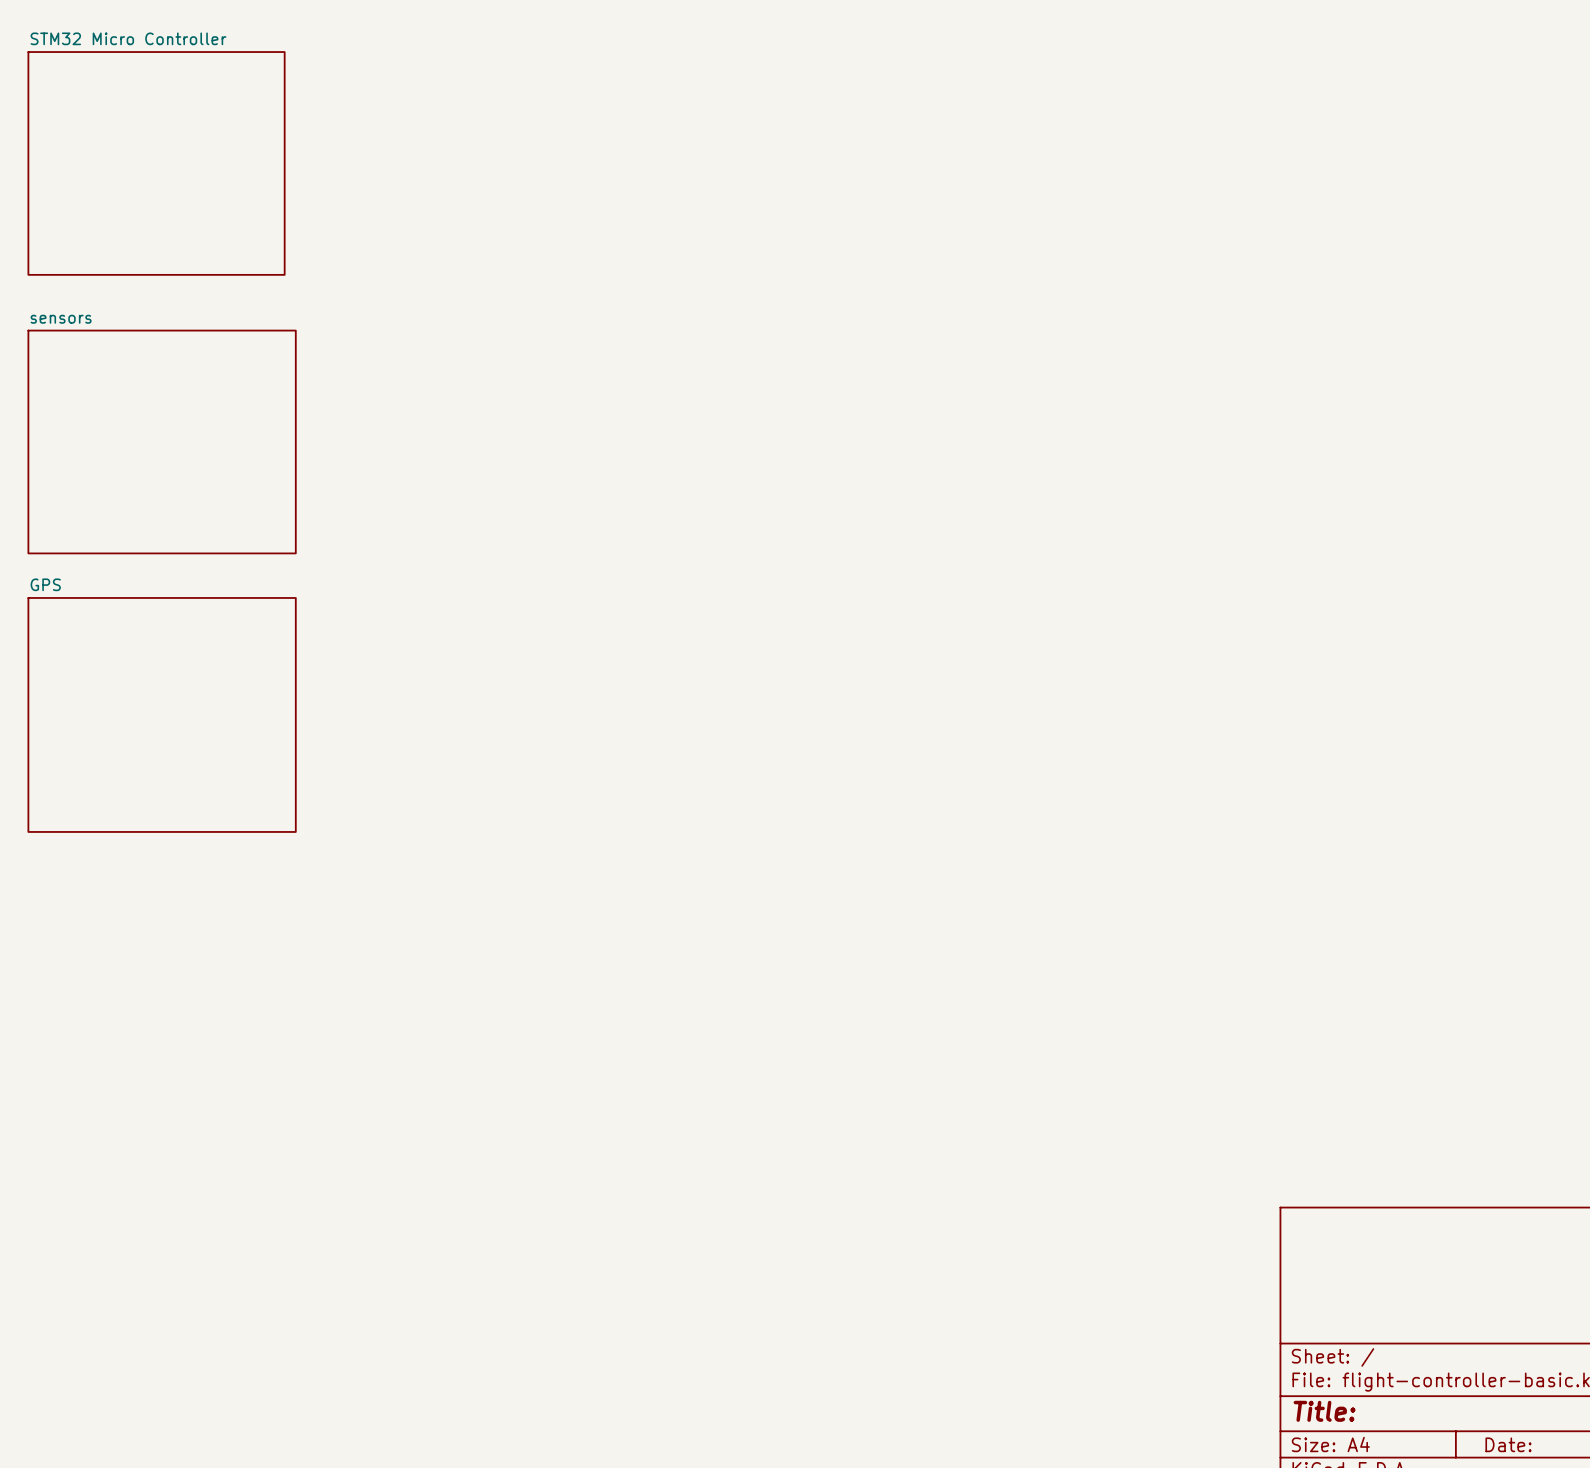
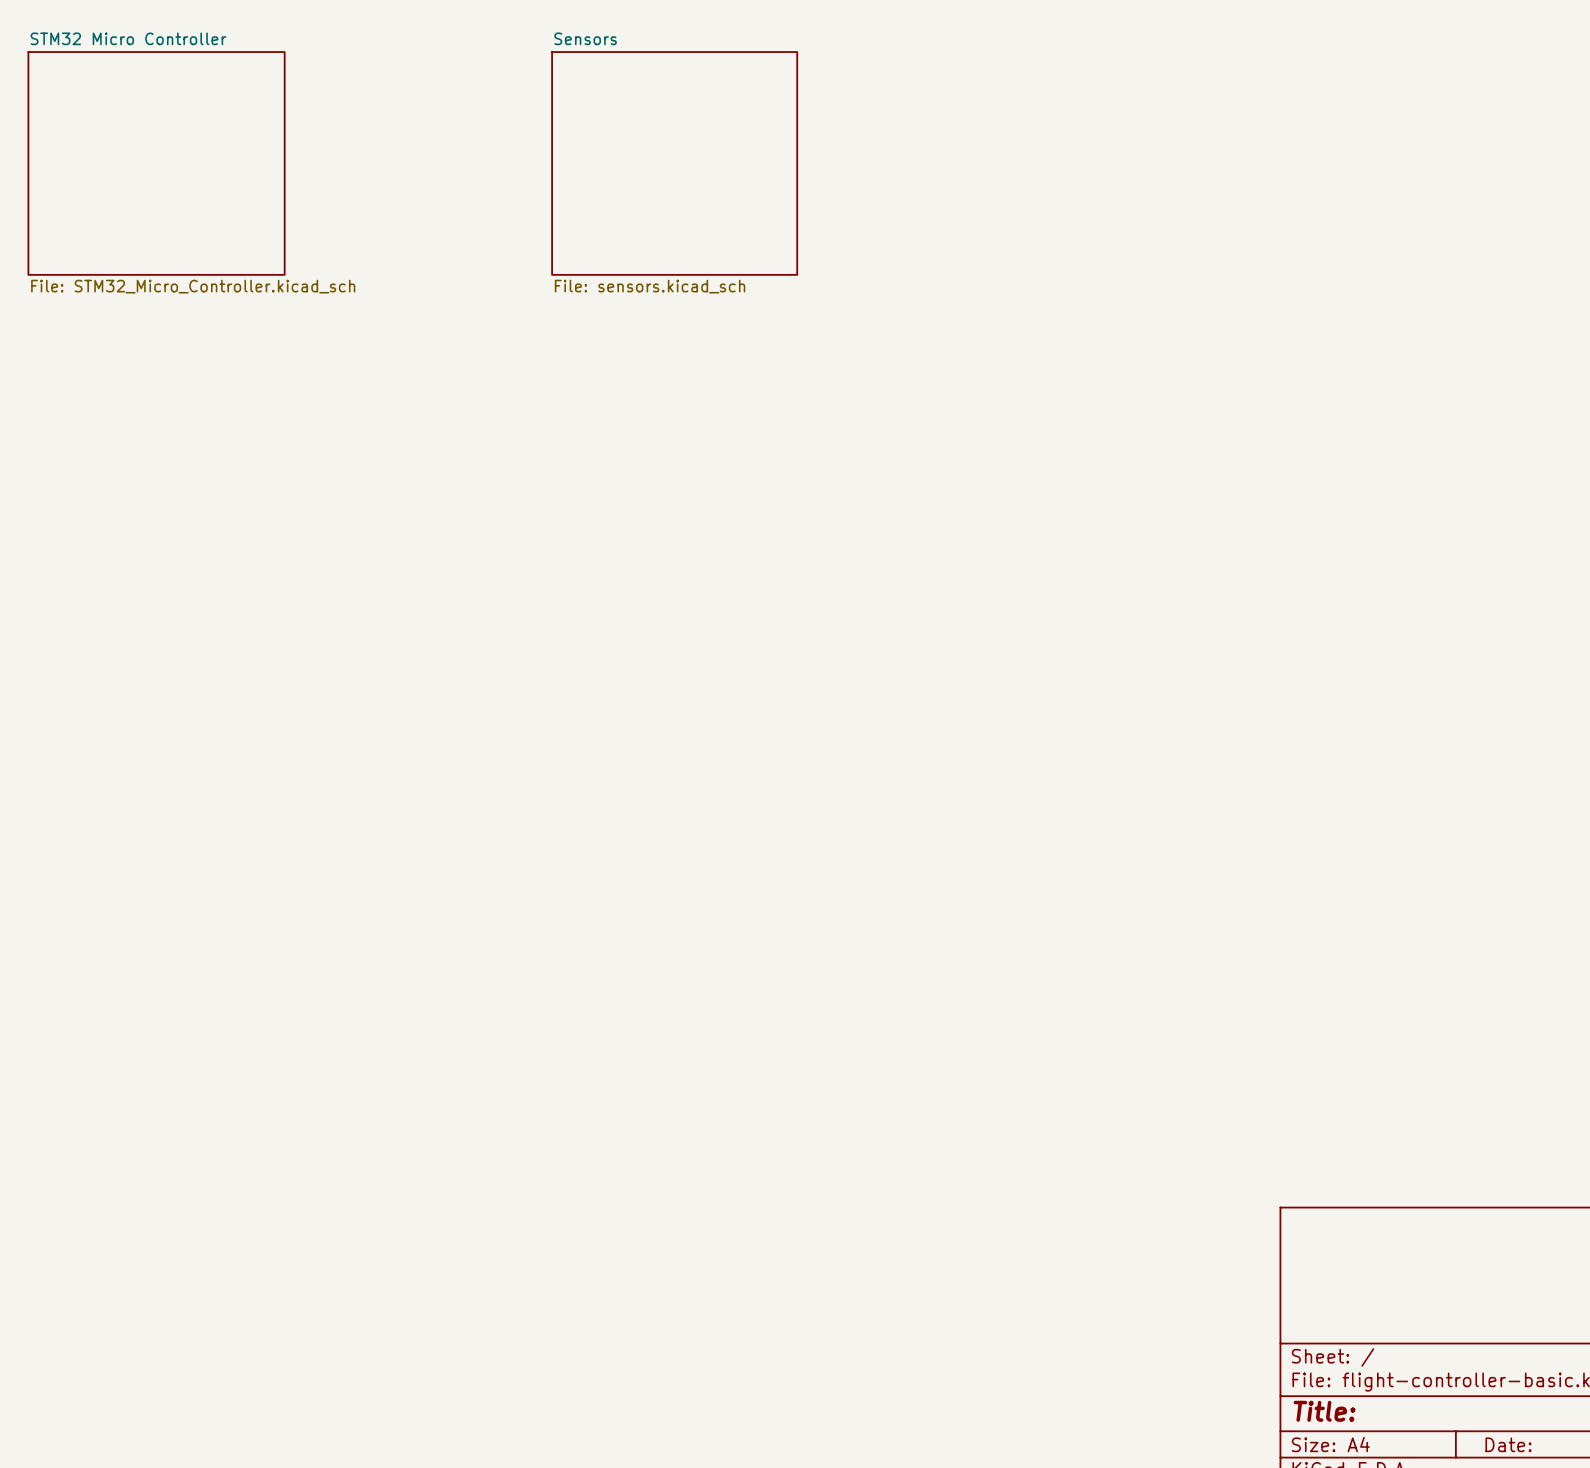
sheet Sensors: none -> File: sensors.kicad_sch (674, 163)
sheet STM32 Micro Controller value: none -> File: STM32_Micro_Controller.kicad_sch (193, 286)
sheet sensors: (162, 441) -> none
sheet GPS: (162, 714) -> none

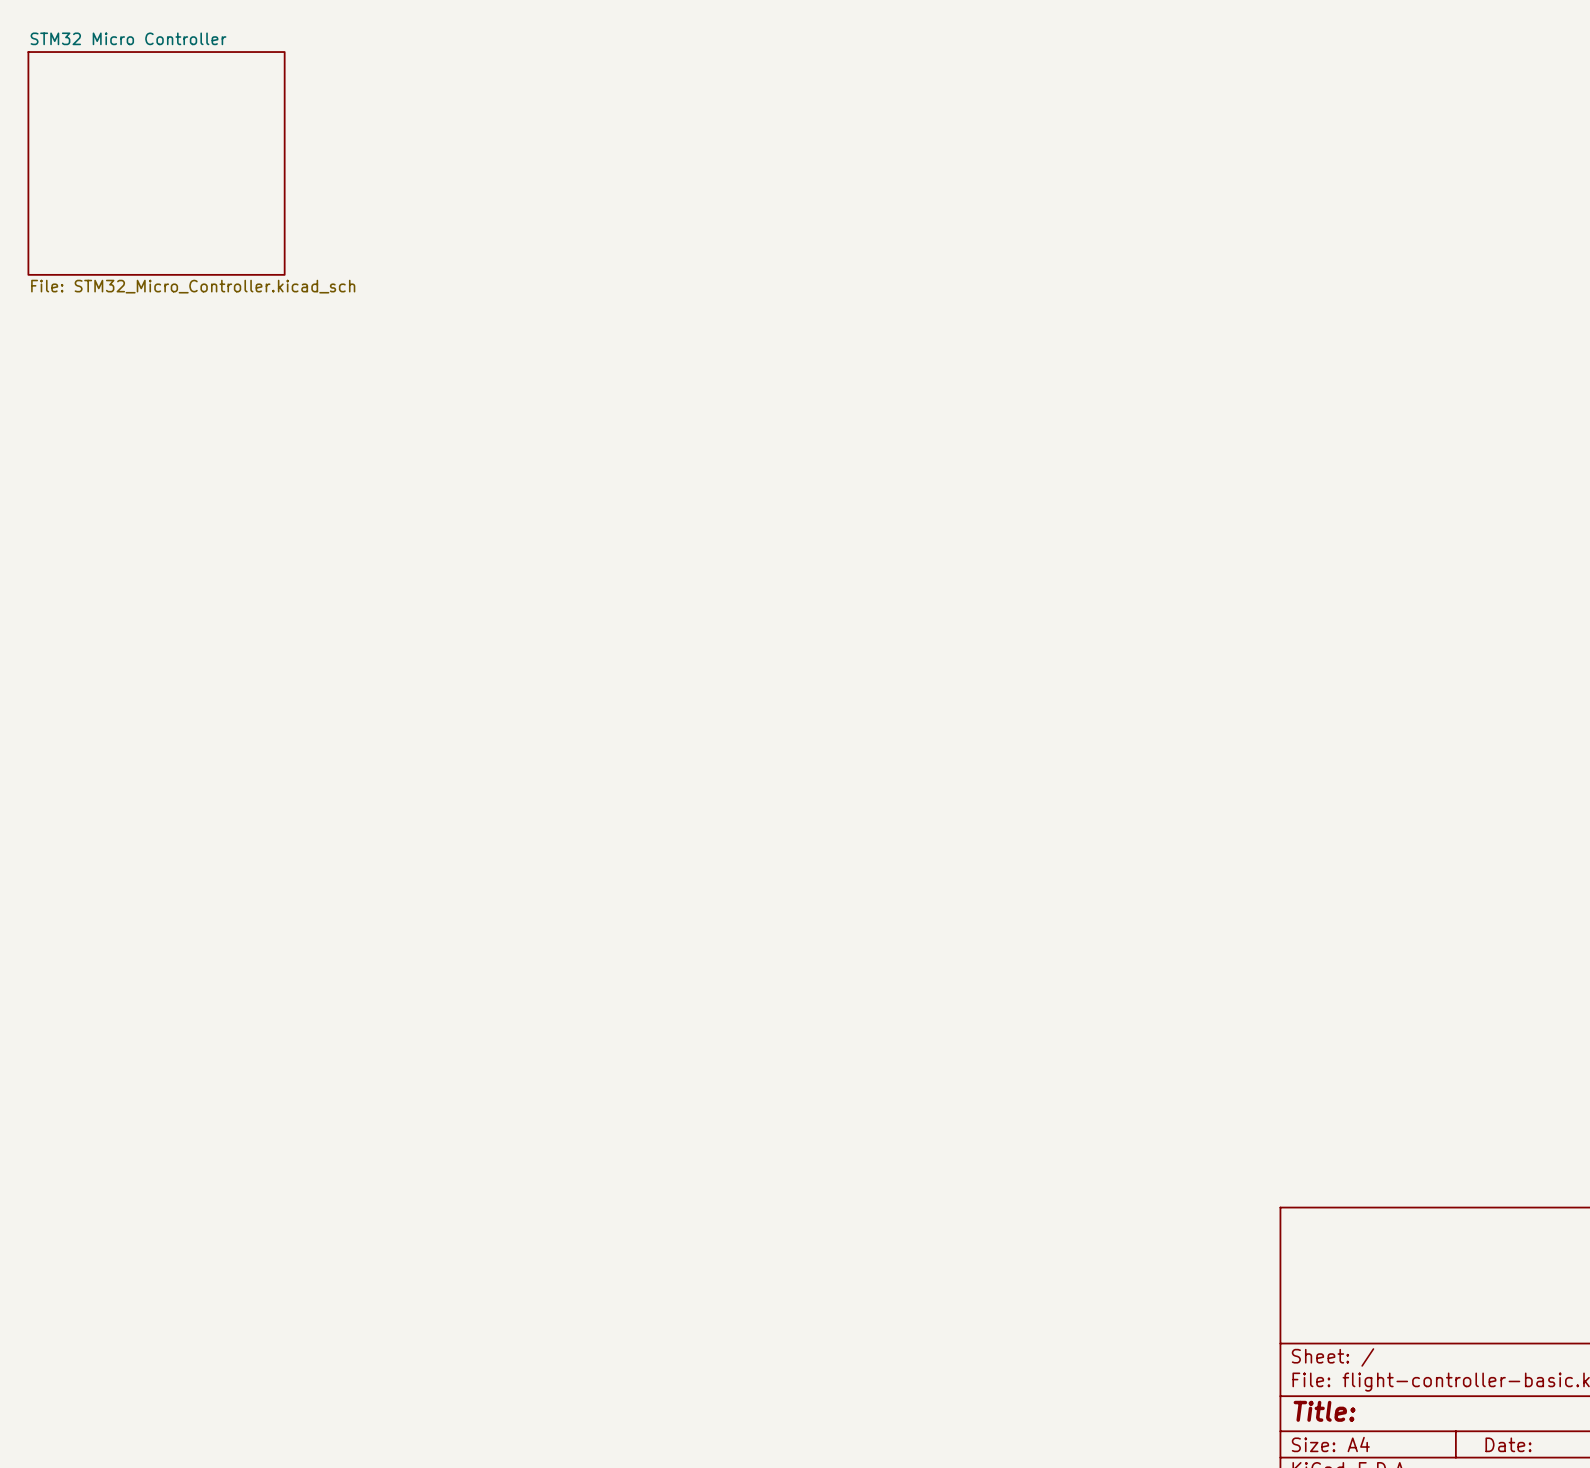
sheet Sensors: File: sensors.kicad_sch (674, 163) -> none

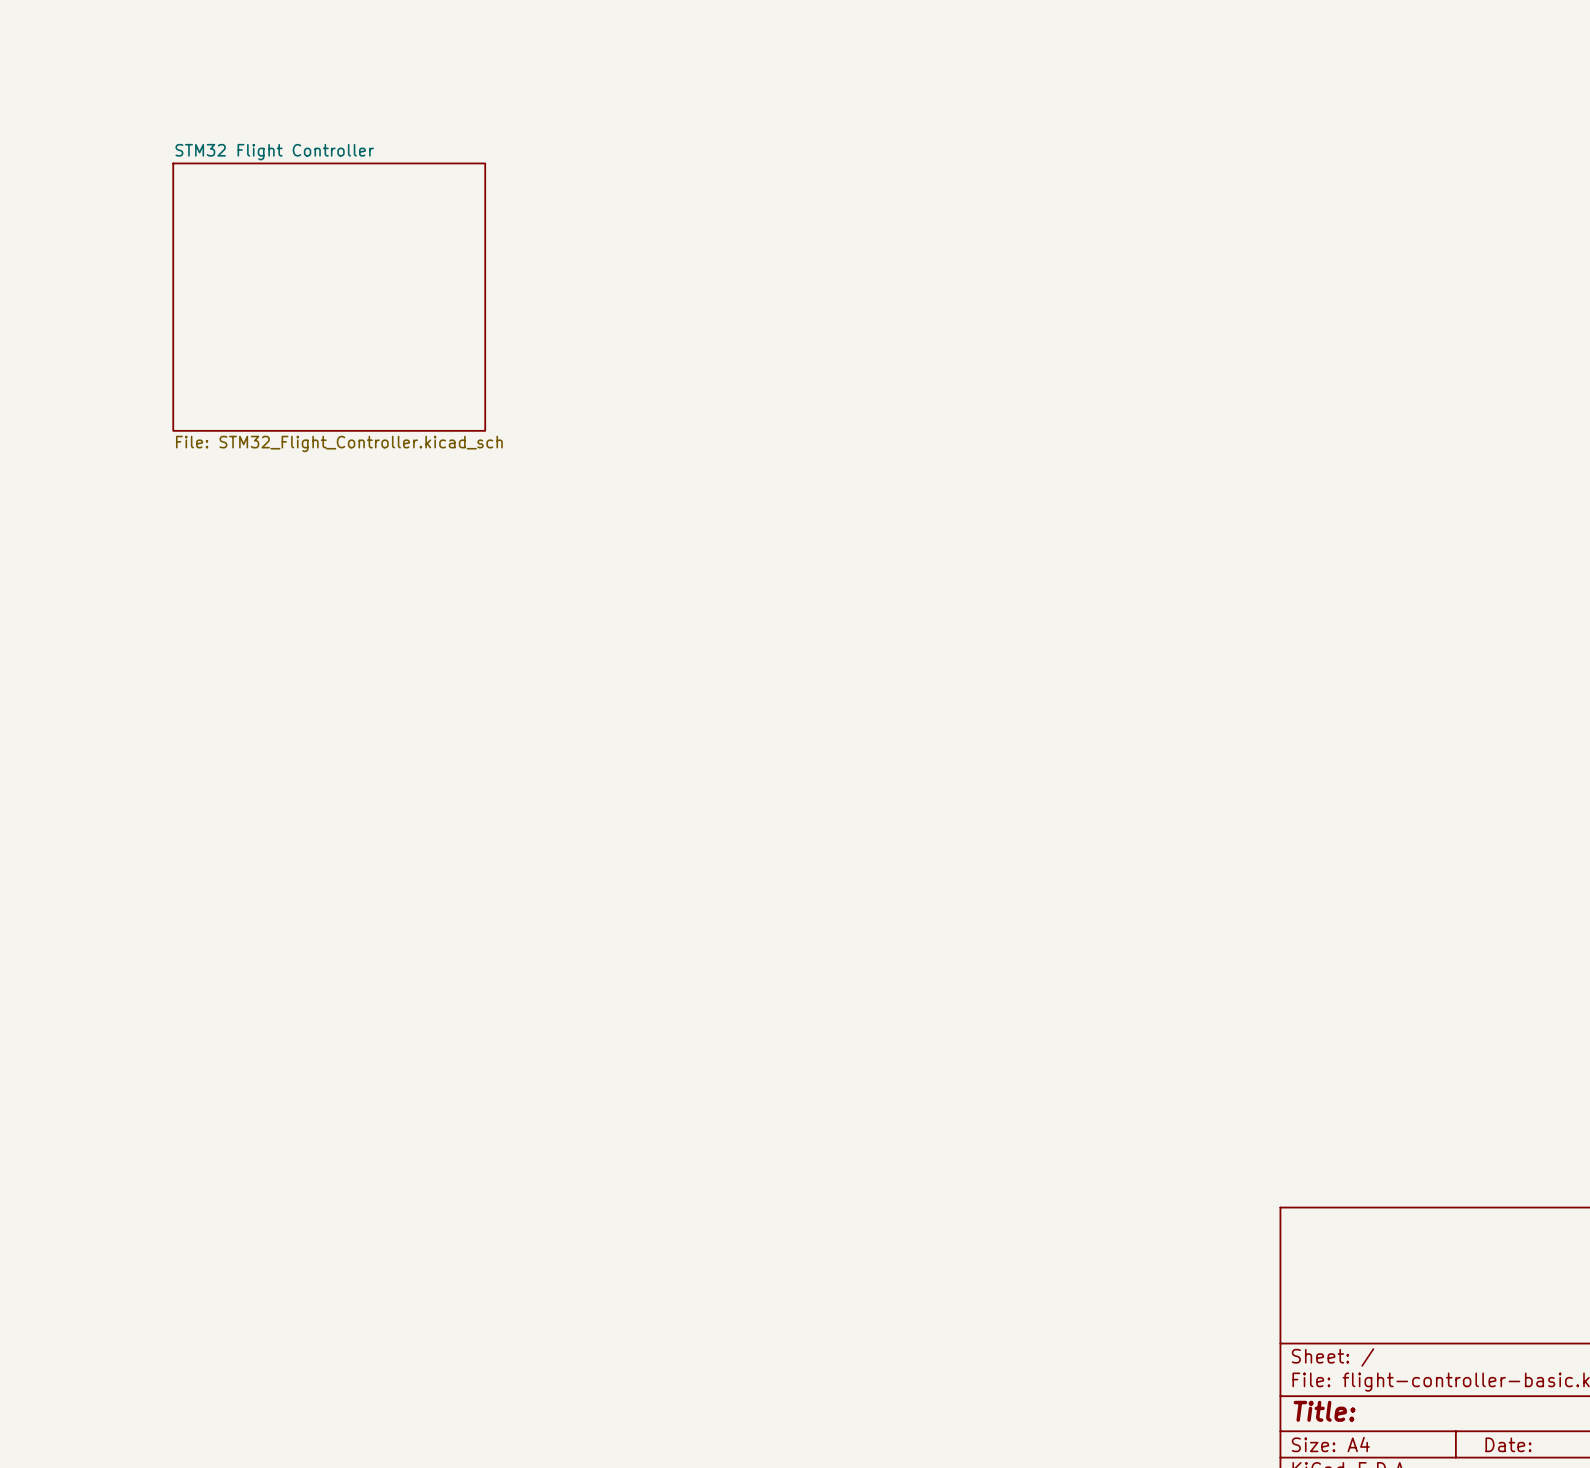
sheet STM32 Micro Controller: File: STM32_Micro_Controller.kicad_sch (156, 163) -> none
sheet STM32 Flight Controller: none -> File: STM32_Flight_Controller.kicad_sch (329, 297)

